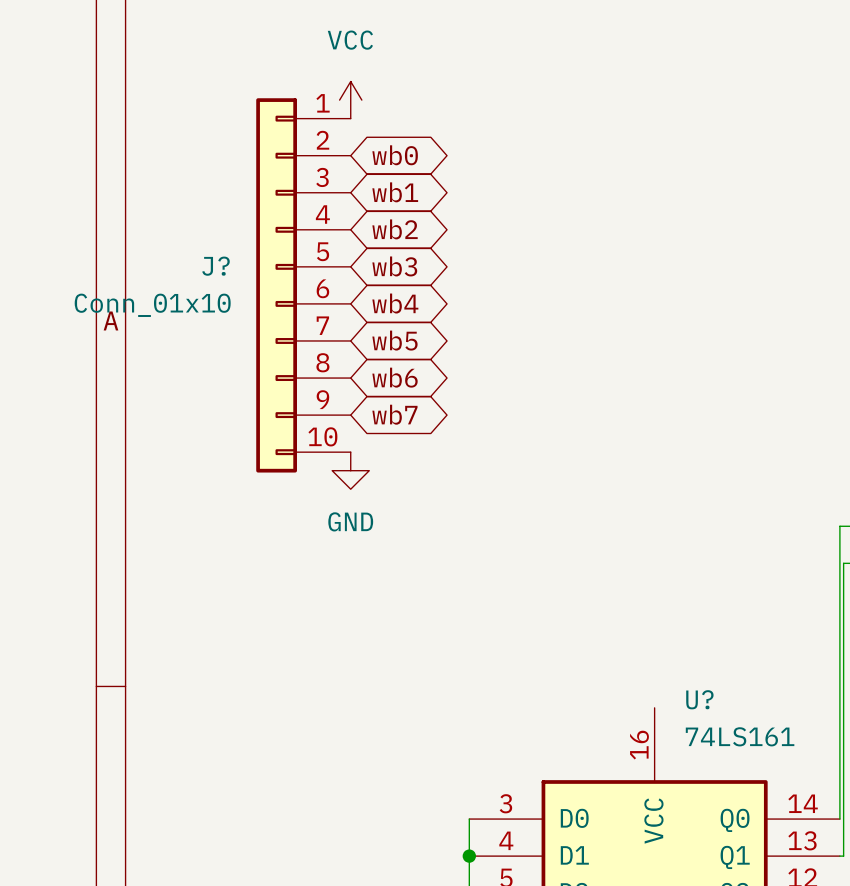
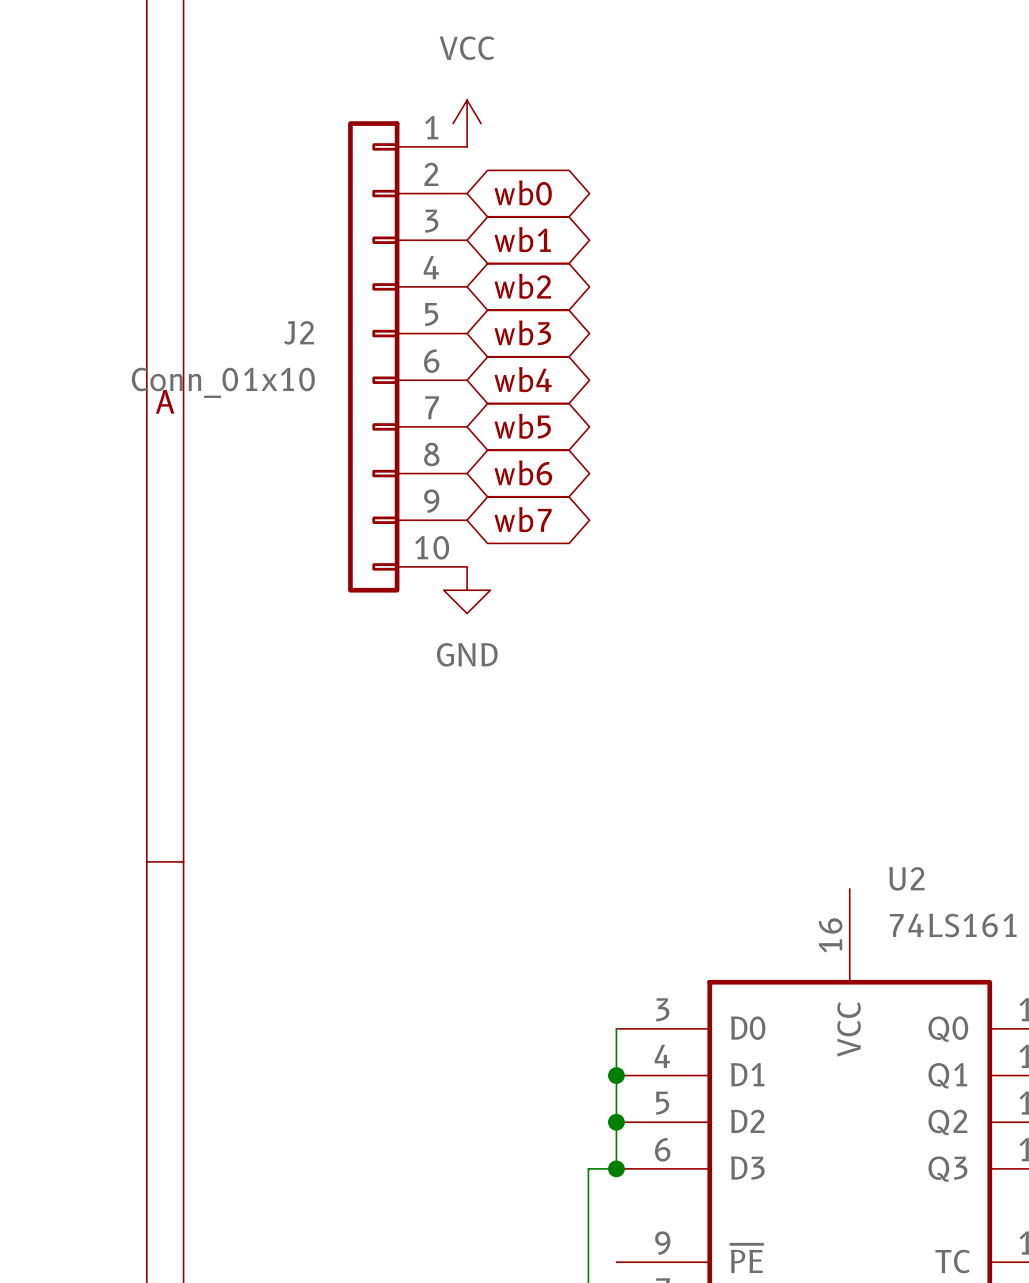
J? name: J? (216, 266) -> J2 (299, 332)
U? name: U? (699, 699) -> U2 (906, 878)

